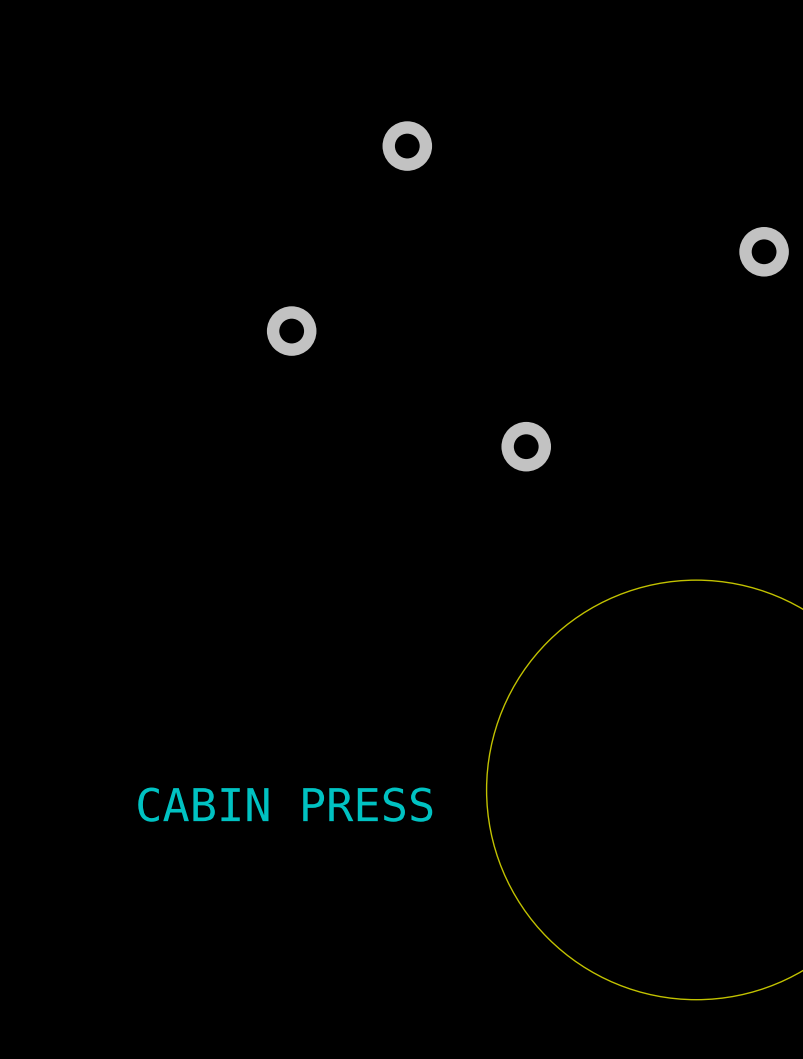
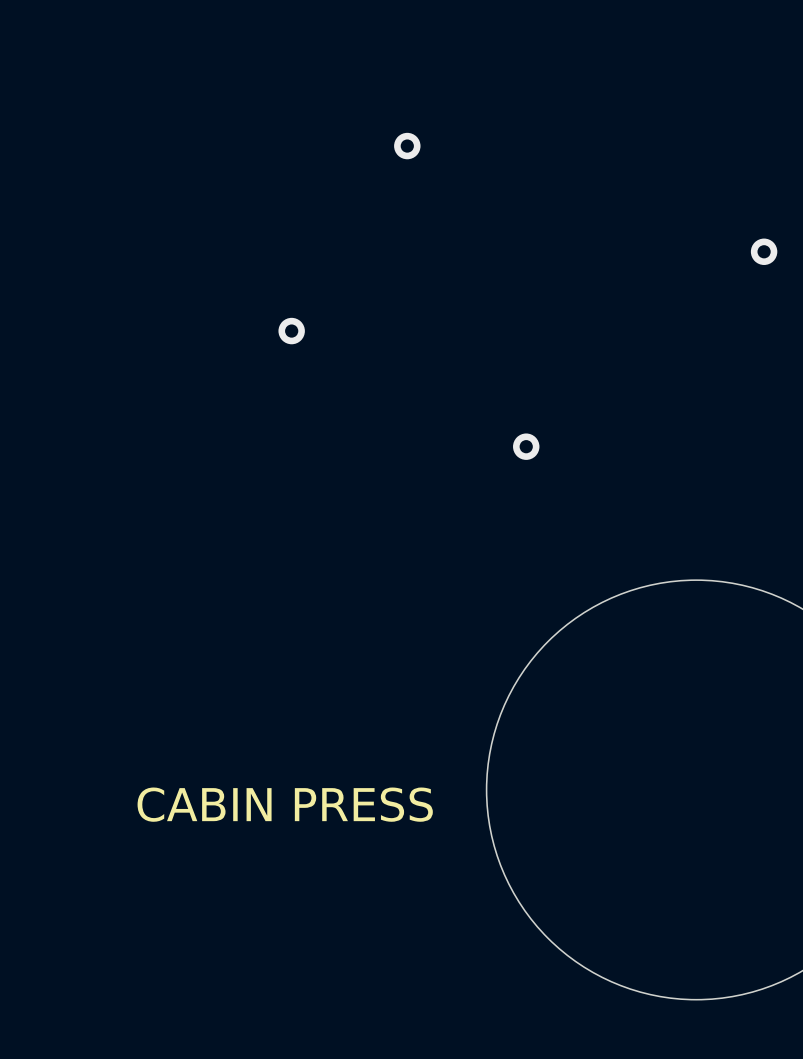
via size: [382, 121, 433, 171] -> [394, 132, 421, 160]
via size: [739, 226, 789, 277] -> [750, 238, 778, 265]
via size: [266, 306, 317, 356] -> [278, 317, 305, 345]
via size: [501, 421, 552, 472] -> [513, 433, 540, 460]

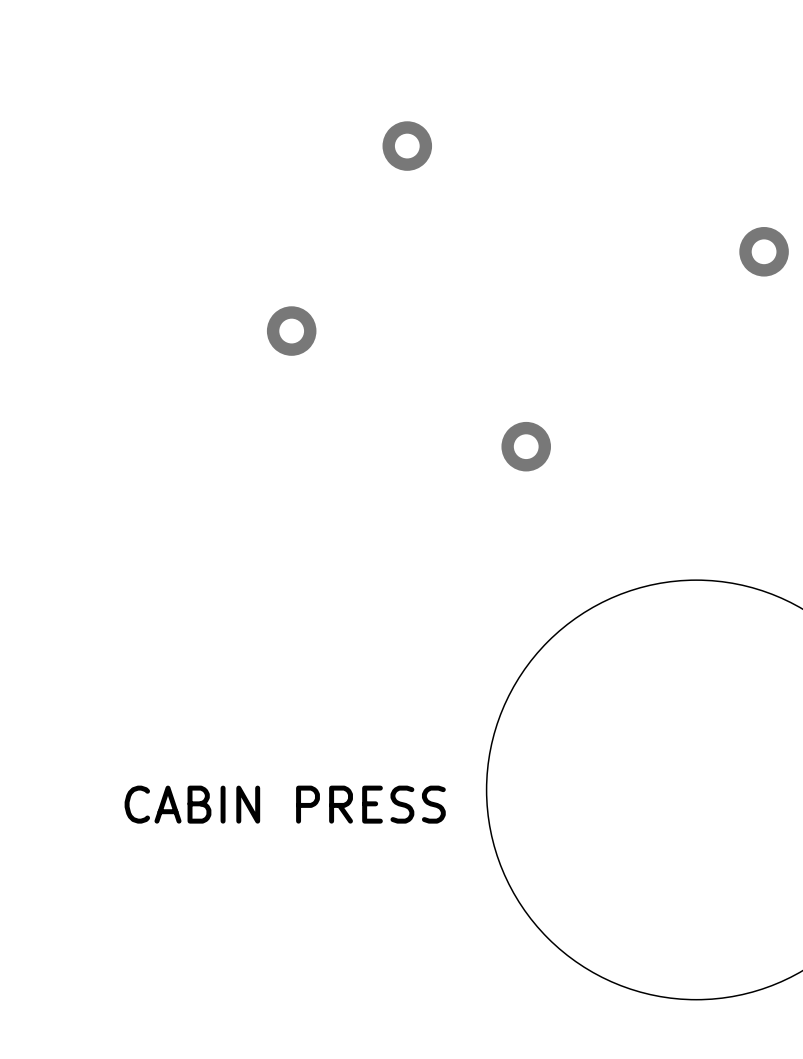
via size: [394, 132, 421, 160] -> [382, 121, 433, 171]
via size: [750, 238, 778, 265] -> [739, 226, 789, 277]
via size: [278, 317, 305, 345] -> [266, 306, 317, 356]
via size: [513, 433, 540, 460] -> [501, 421, 552, 472]

